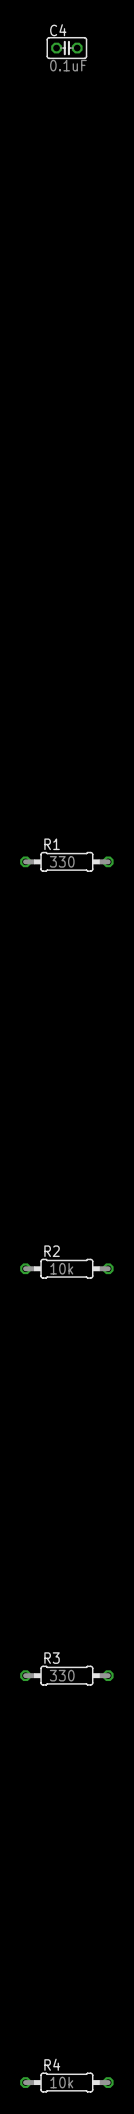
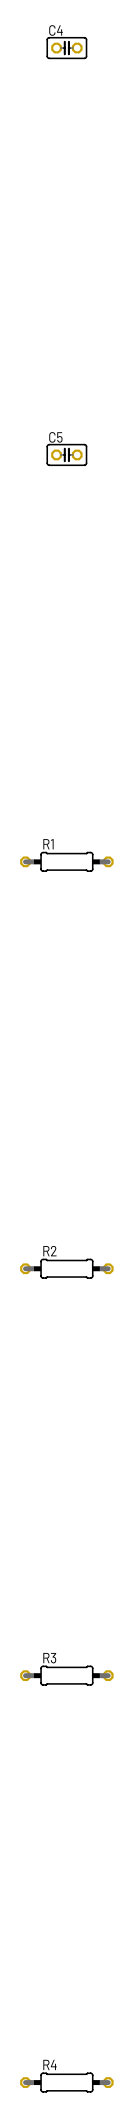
C4 value: 0.1uF (68, 65) -> none
C5: none -> (66, 454)
R1 value: 330 (62, 861) -> none
R2 value: 10k (61, 1268) -> none
R3 value: 330 (62, 1675) -> none
R4 value: 10k (61, 2082) -> none

